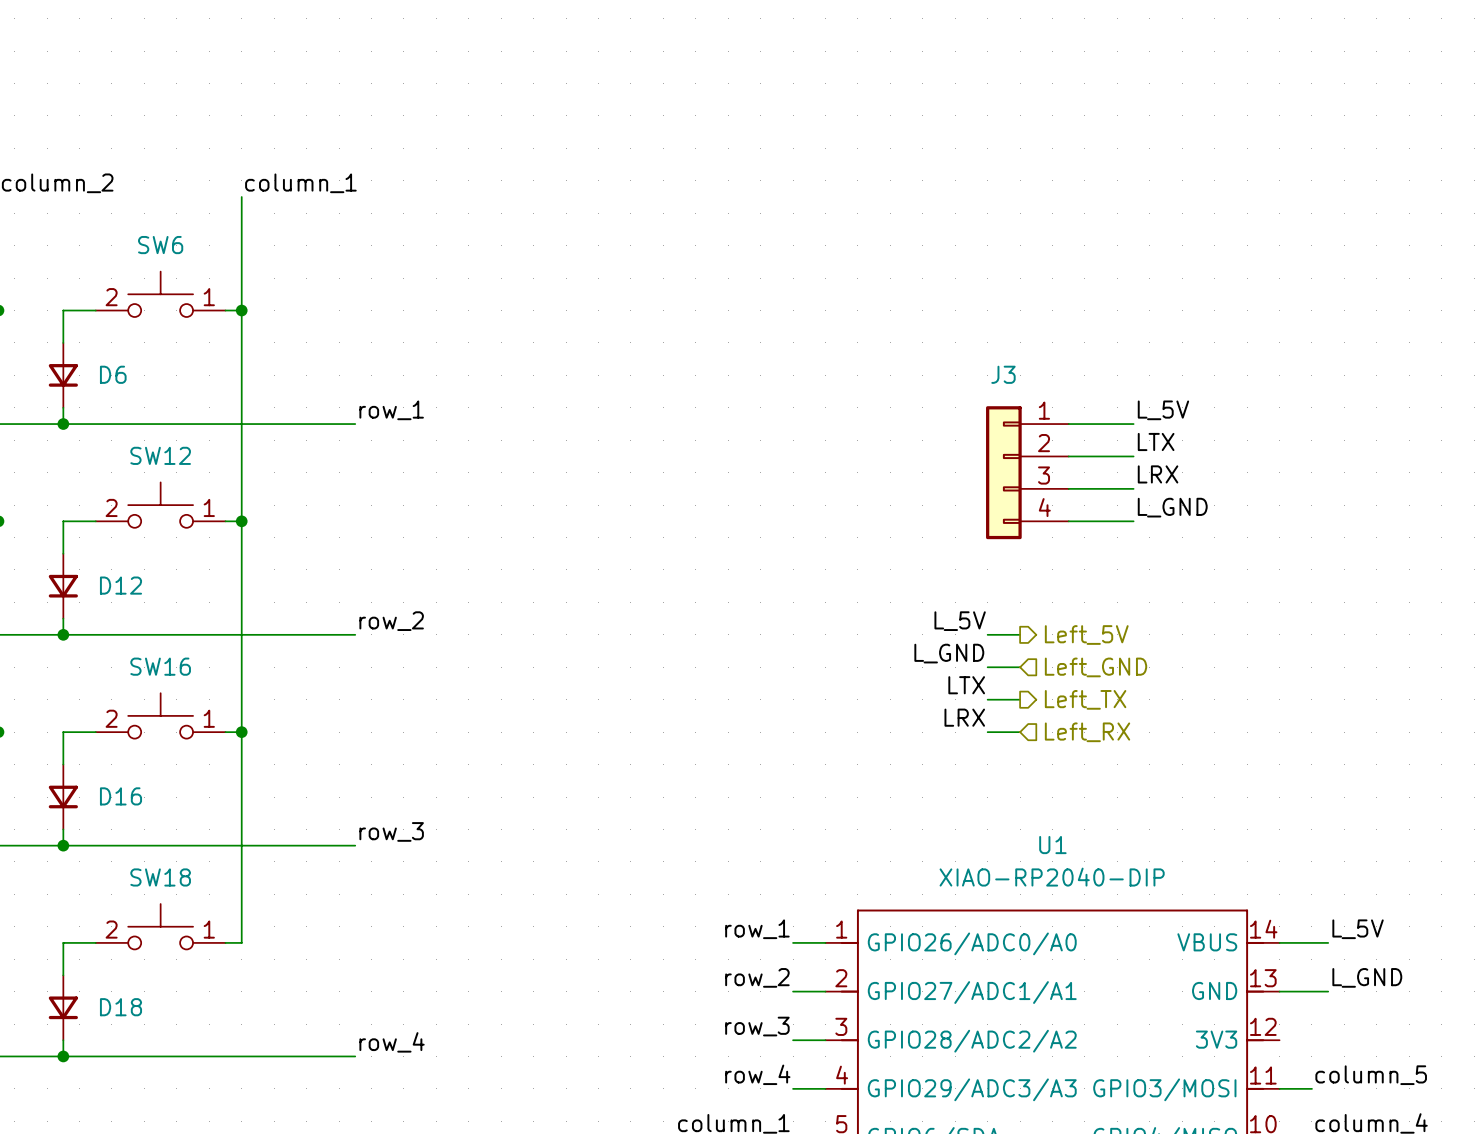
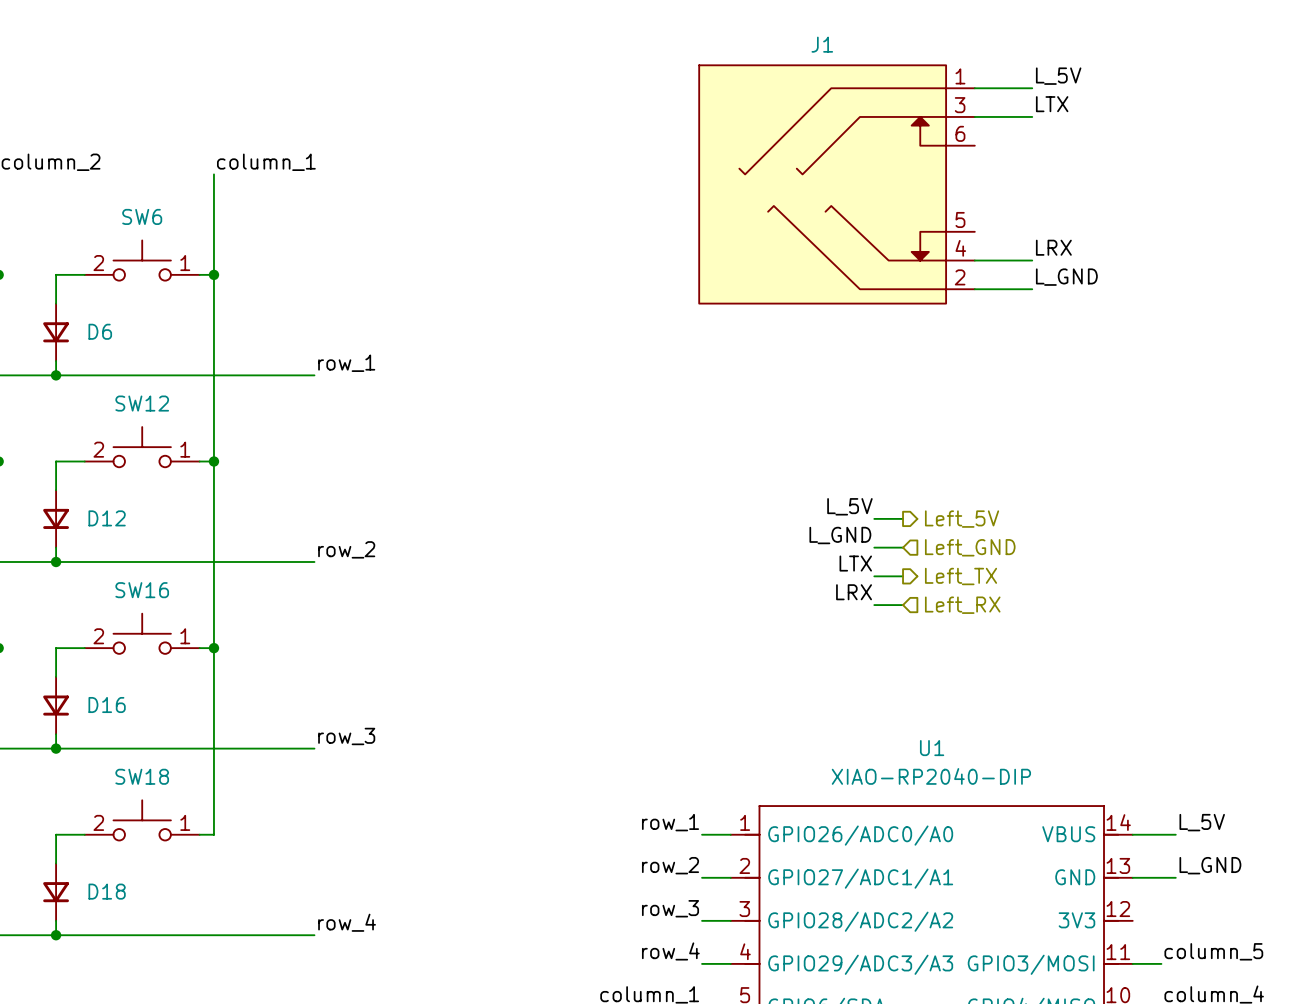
label: none -> L_5V (1058, 76)
wire: none -> (974, 88) (1032, 88)
label: none -> LTX (1052, 104)
wire: none -> (974, 116) (1032, 116)
J1: none -> (836, 184)
label: none -> LRX (1053, 247)
label: none -> L_GND (1066, 277)
label: L_5V (1163, 410) -> none
wire: (1068, 424) (1133, 424) -> (974, 260) (1032, 260)
label: LTX (1156, 441) -> none
wire: (1068, 456) (1133, 456) -> (974, 289) (1032, 289)
J3: (1027, 472) -> none
label: LRX (1158, 474) -> none
wire: (1068, 488) (1133, 488) -> none
label: L_GND (1172, 507) -> none
wire: (1068, 521) (1133, 521) -> none
label position: L_5V (960, 621) -> L_5V (849, 506)
wire: (987, 634) (1020, 634) -> (874, 518) (903, 518)
hierarchical label position: Left_5V (1086, 635) -> Left_5V (962, 519)
label position: L_GND (949, 653) -> L_GND (840, 535)
wire: (987, 667) (1020, 667) -> (874, 547) (903, 547)
hierarchical label position: Left_GND (1096, 667) -> Left_GND (970, 547)
label position: LTX (966, 685) -> LTX (855, 563)
wire: (987, 699) (1020, 699) -> (874, 576) (903, 576)
hierarchical label position: Left_TX (1085, 699) -> Left_TX (961, 576)
label position: LRX (964, 717) -> LRX (854, 592)
wire: (987, 732) (1020, 732) -> (874, 605) (903, 605)
hierarchical label position: Left_RX (1087, 732) -> Left_RX (962, 605)

